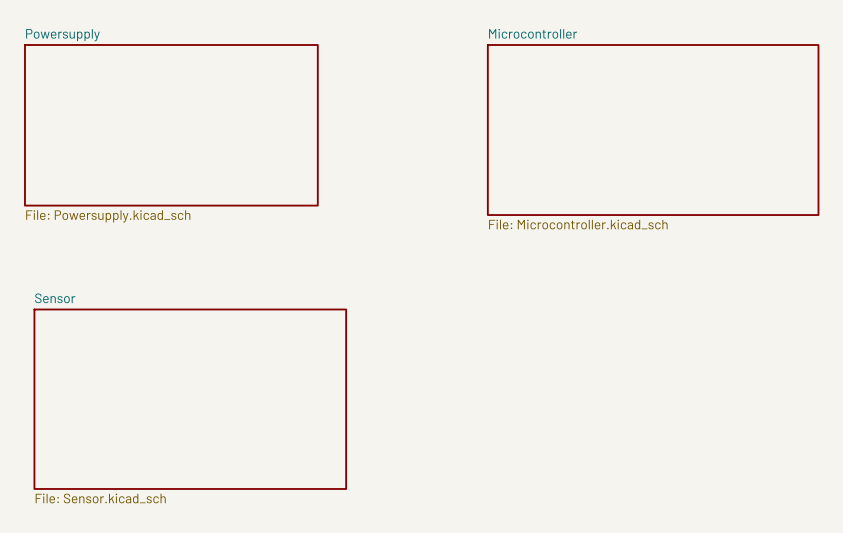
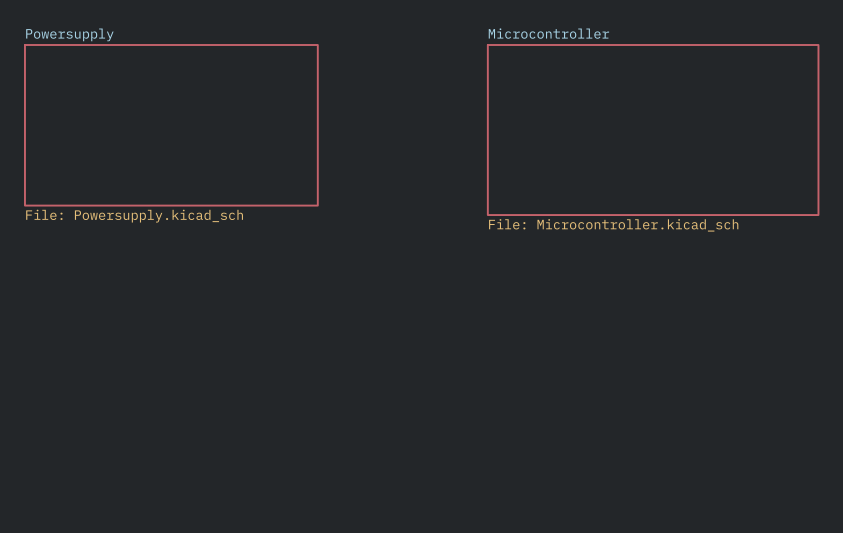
sheet Sensor: File: Sensor.kicad_sch (190, 399) -> none

